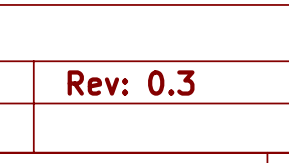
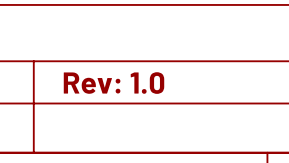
title block: Rev: 0.3 (131, 83) -> Rev: 1.0 (113, 83)

